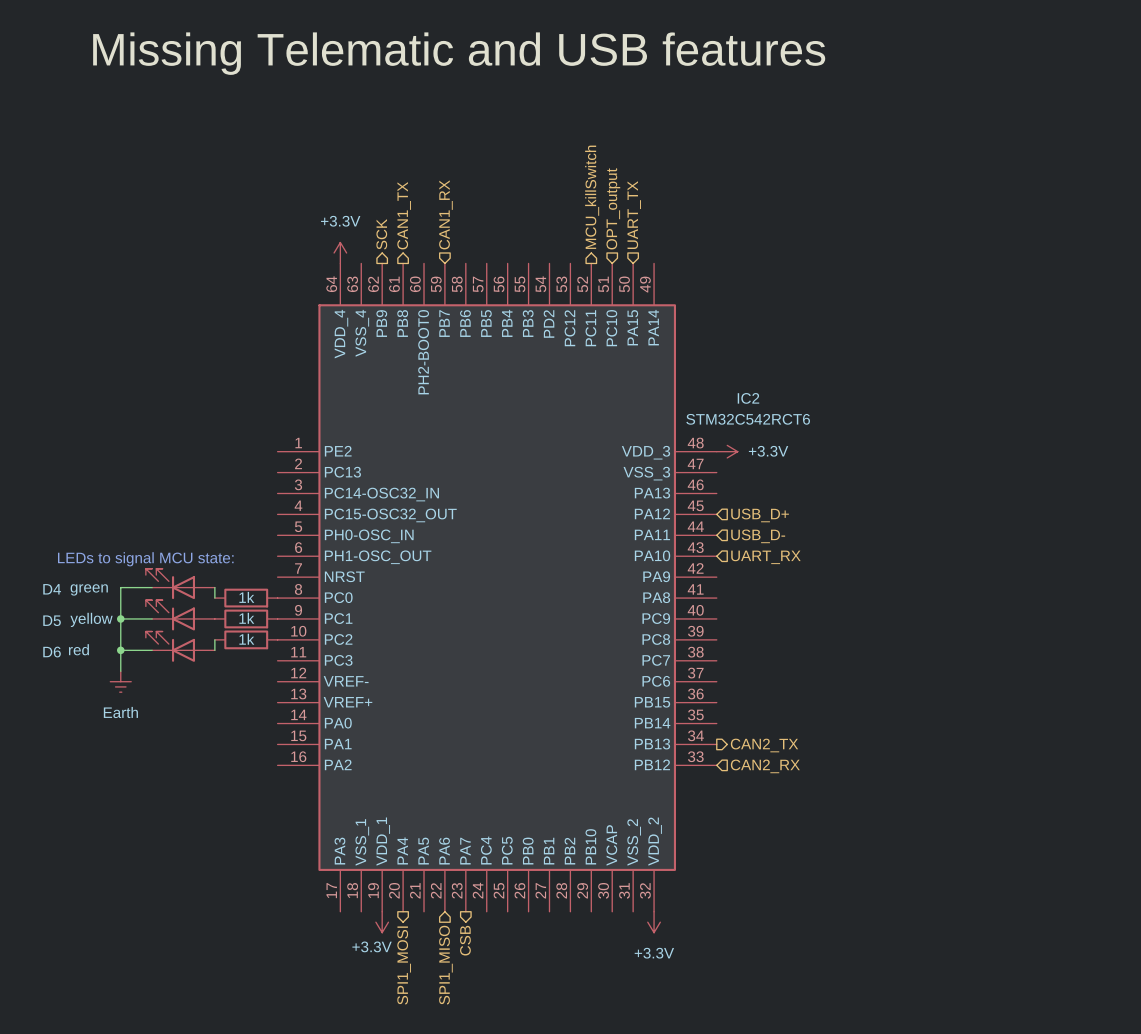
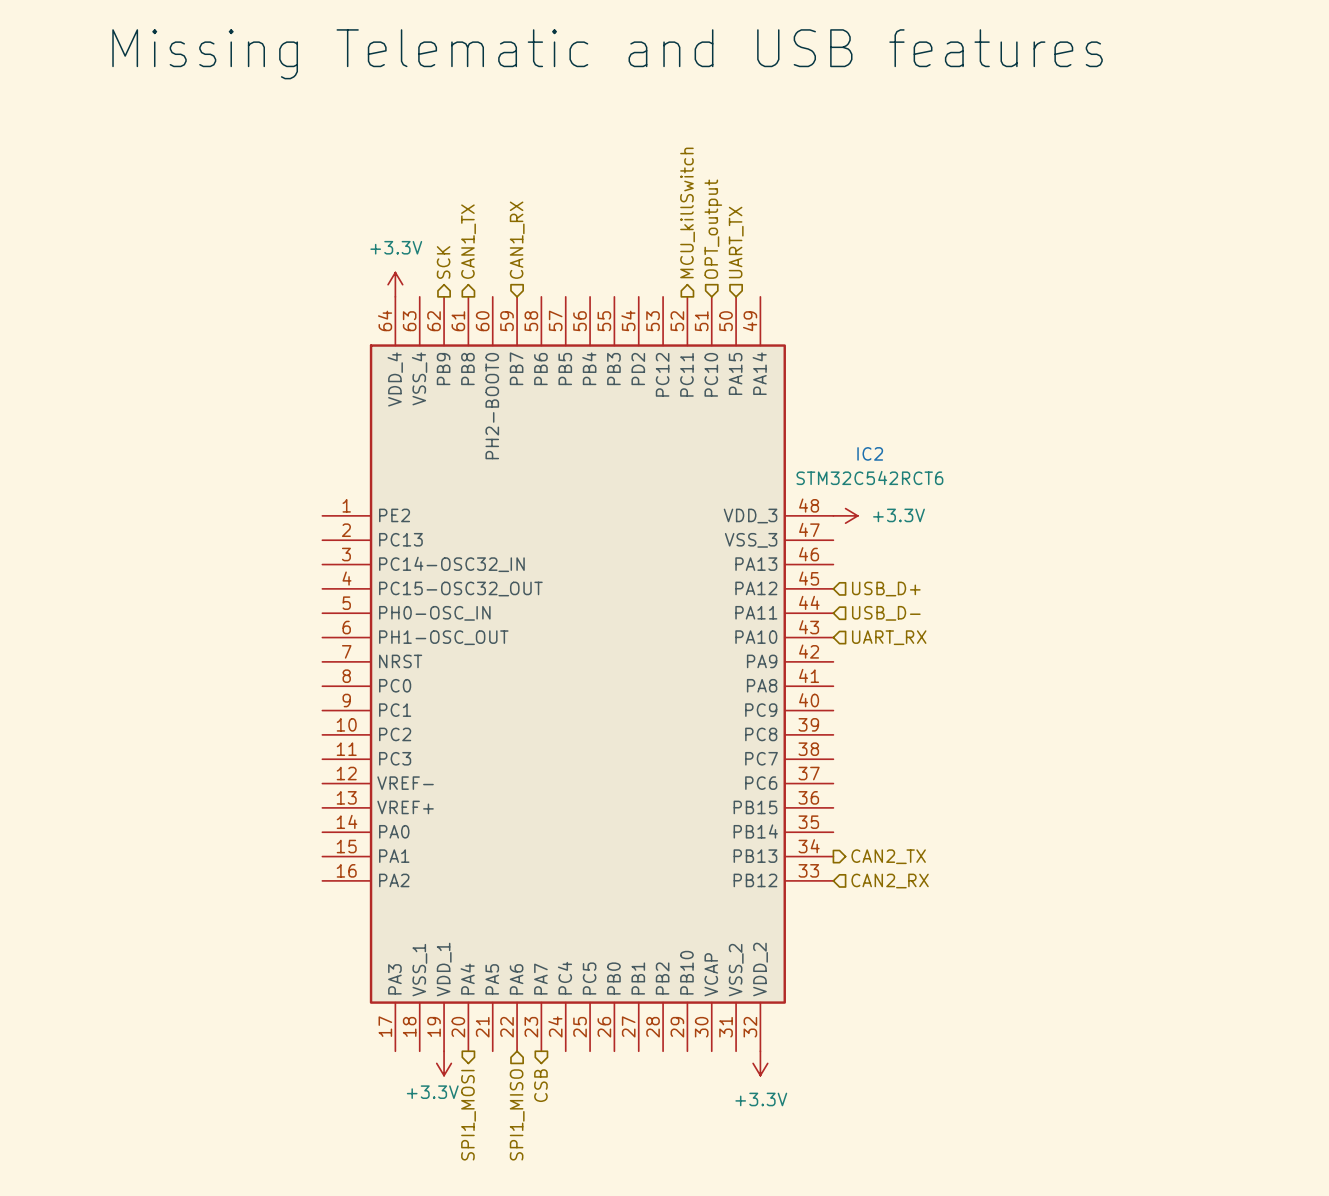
text: LEDs to signal MCU state: (145, 559) -> none
D4: green (180, 583) -> none
wire: (152, 587) (120, 587) (120, 671) -> none
wire: (214, 587) (214, 598) -> none
part: 1k (246, 598) -> none
D5: yellow (180, 615) -> none
wire: (120, 618) (152, 618) -> none
junction: (120, 618) -> none
part: 1k (246, 618) -> none
wire: (214, 639) (214, 650) -> none
part: 1k (246, 639) -> none
D6: red (180, 646) -> none
wire: (120, 650) (152, 650) -> none
junction: (120, 650) -> none
power symbol: Earth (120, 681) -> none

